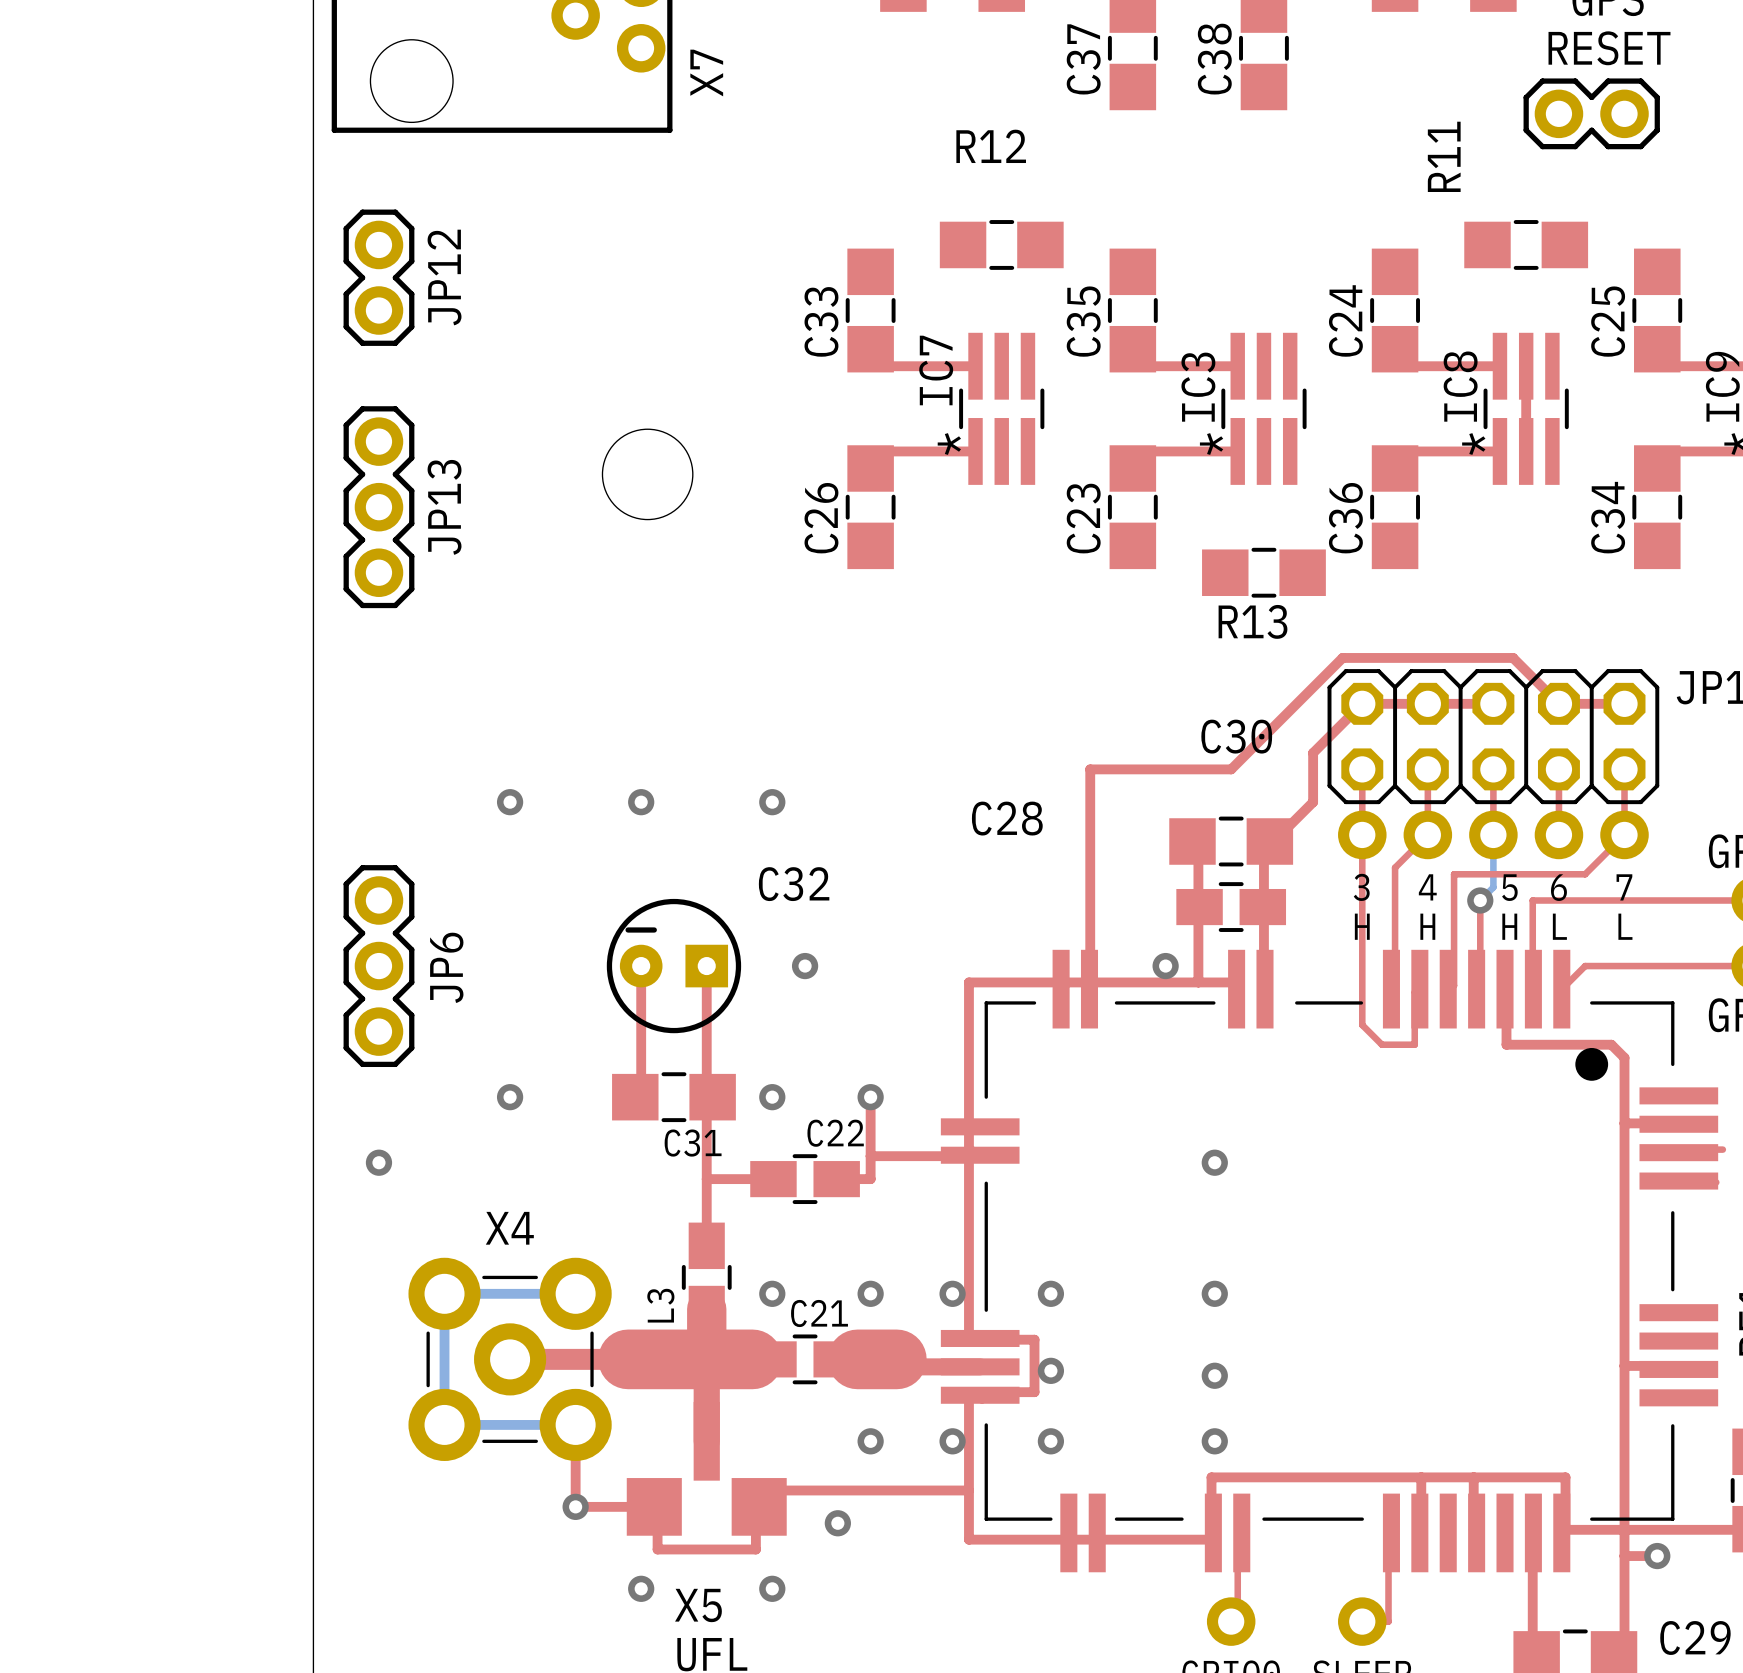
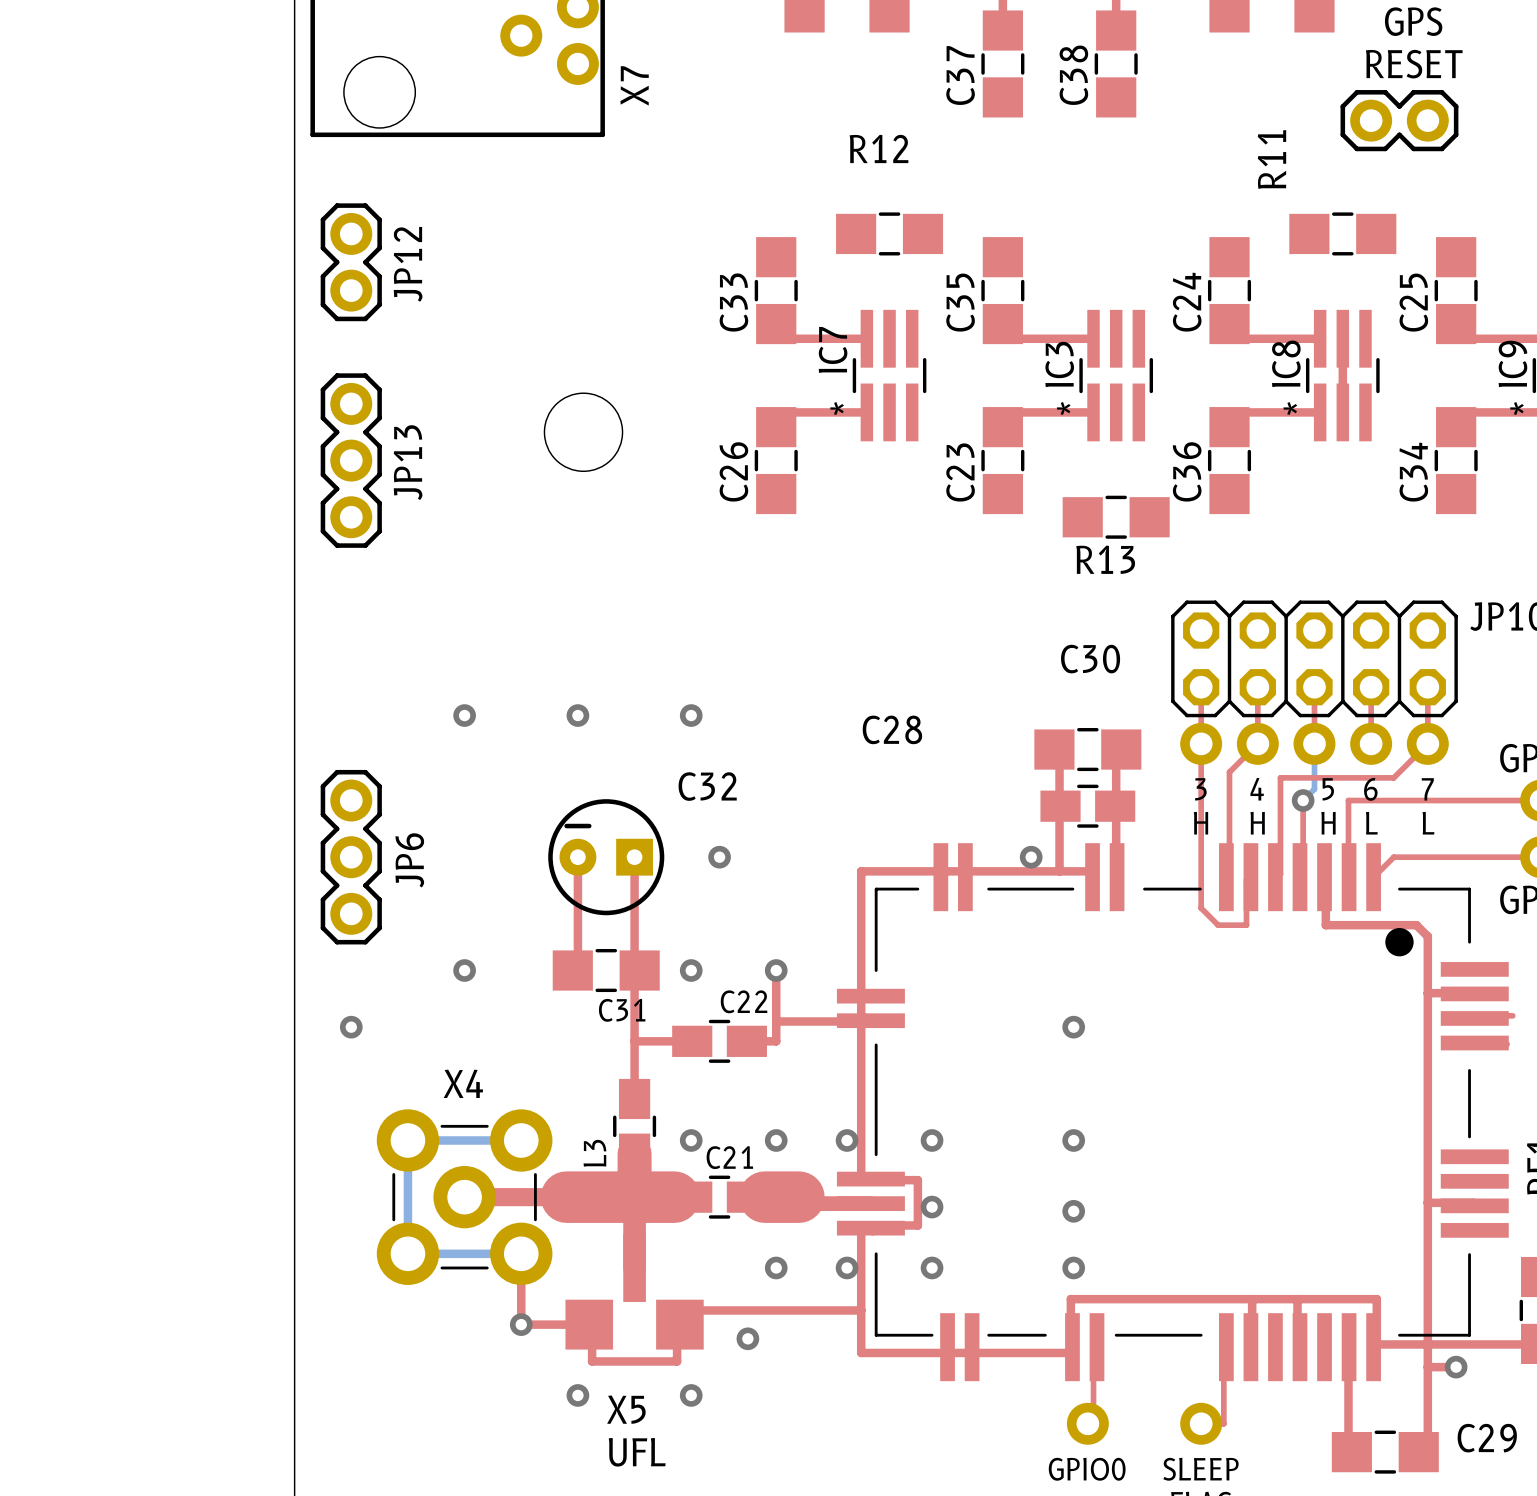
top track: (1493, 703) (1362, 703) (1313, 753) (1313, 802) (1280, 834) -> none
top track: (1624, 703) (1558, 703) (1513, 657) (1342, 657) (1231, 769) (1090, 769) (1090, 982) -> none

